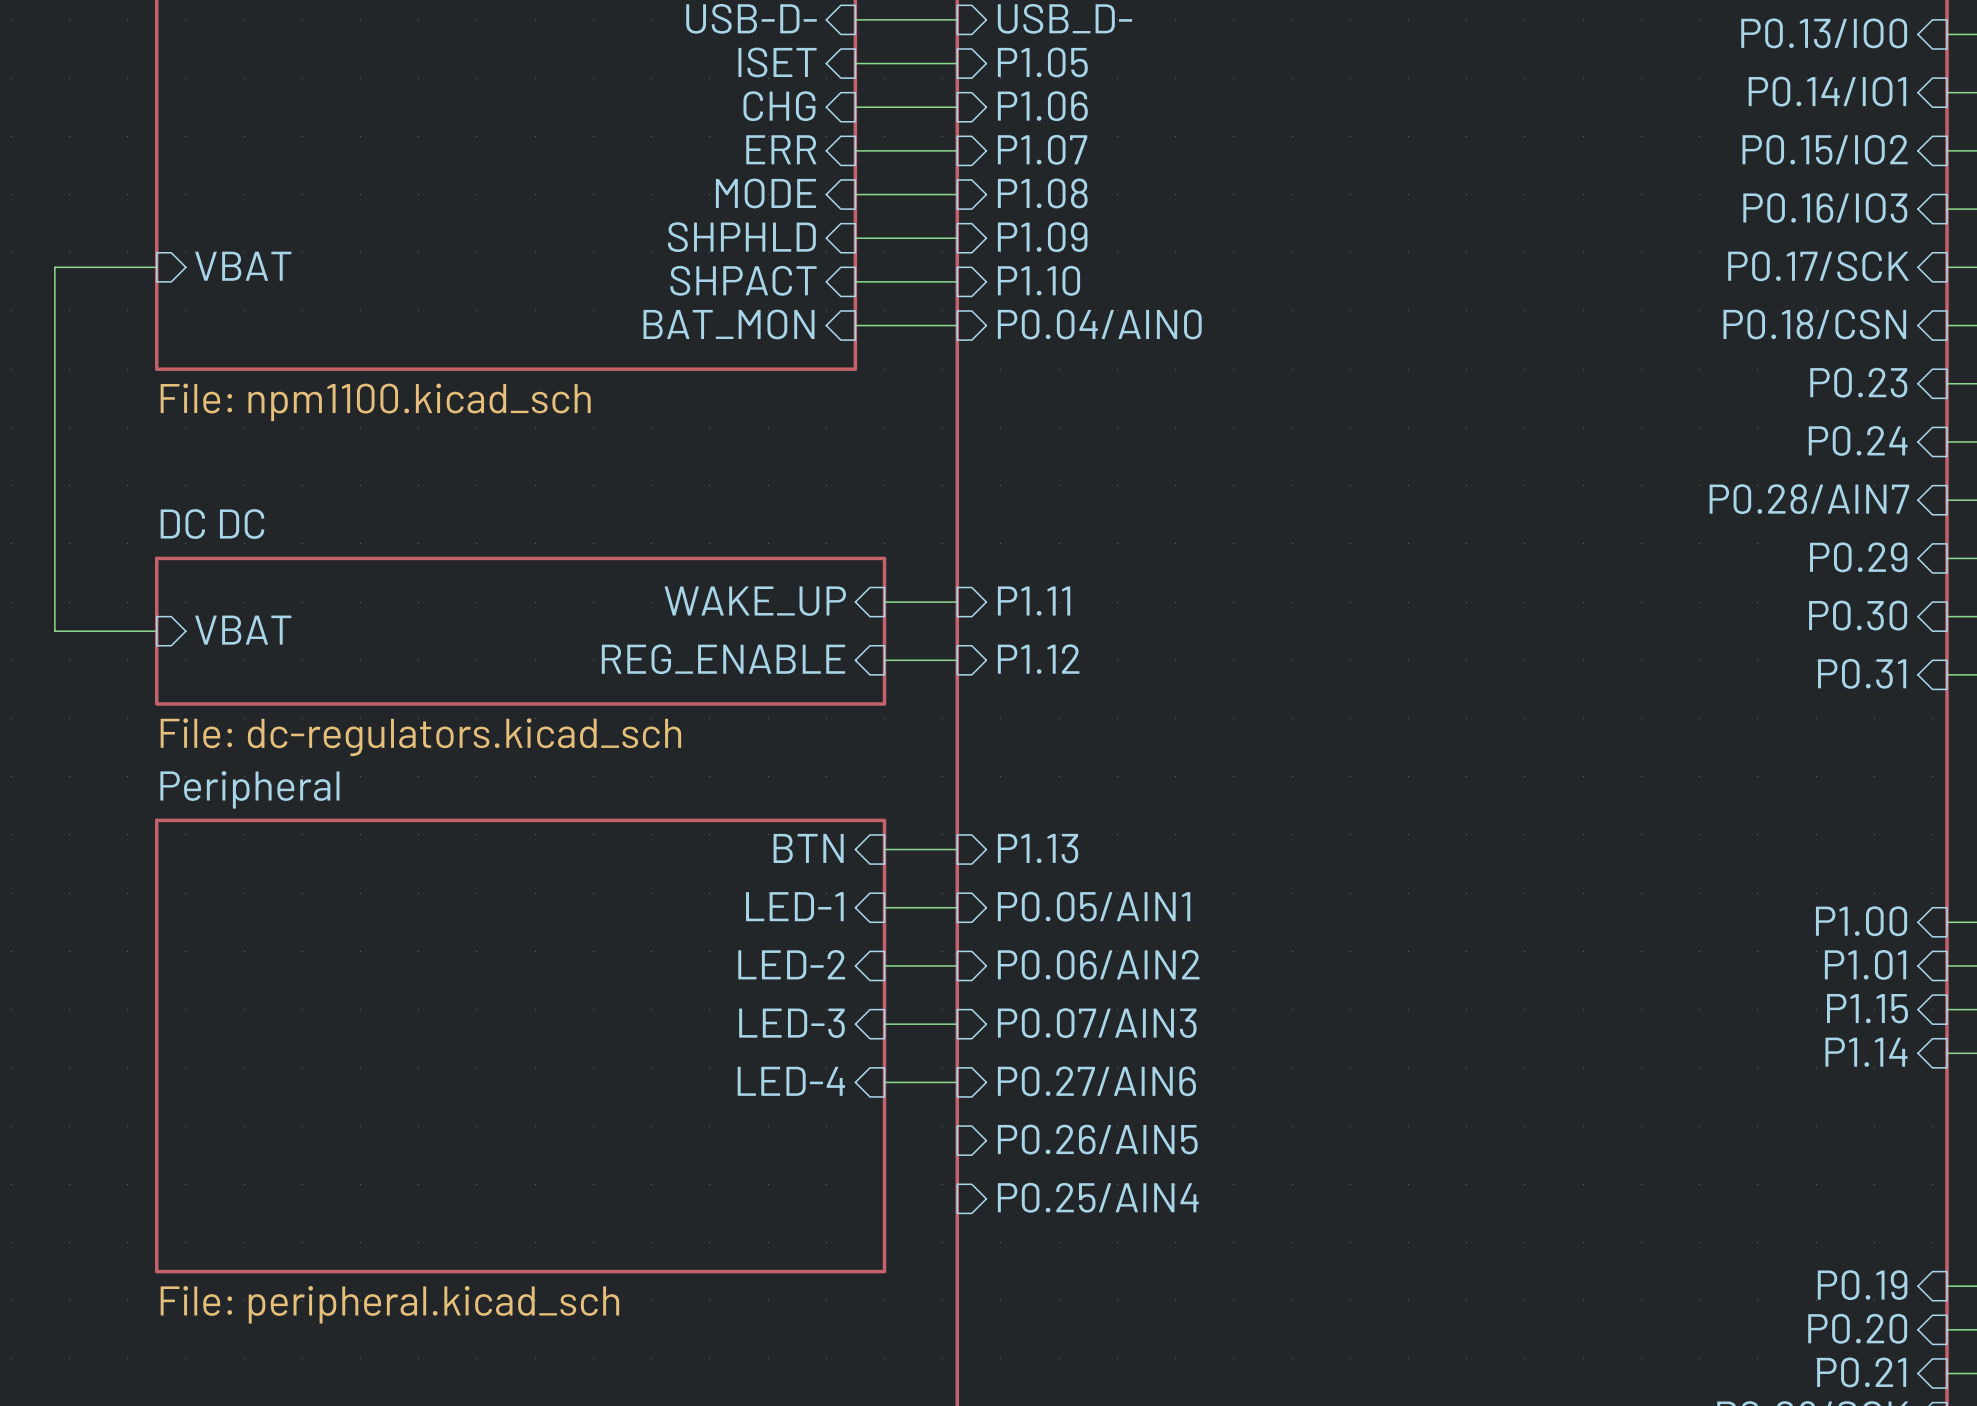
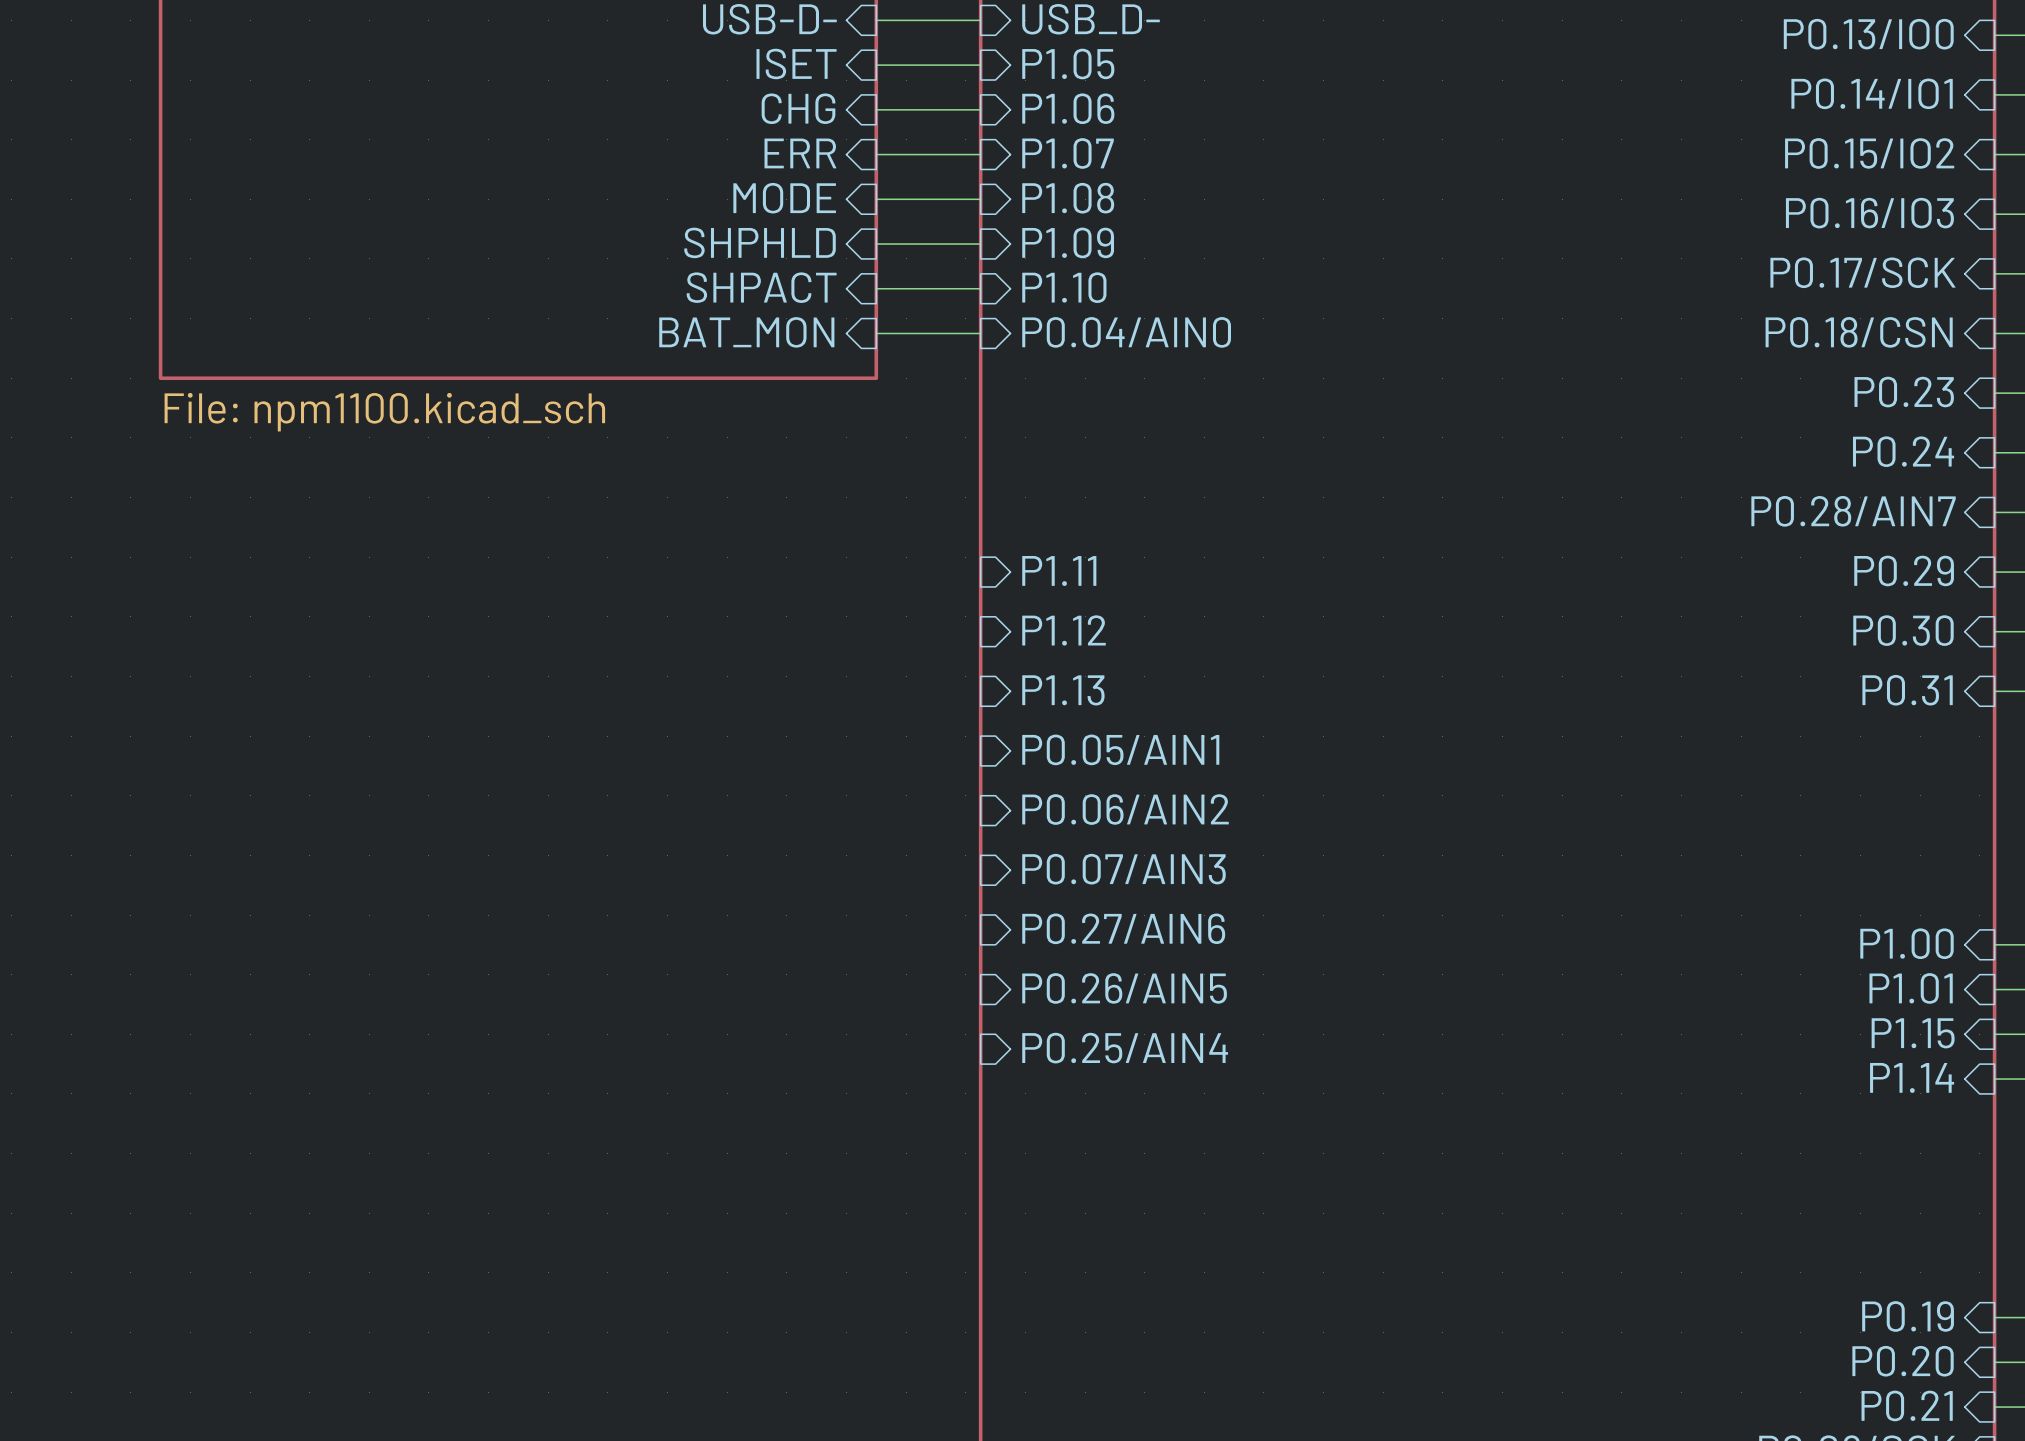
sheet pin: VBAT (243, 266) -> none
wire: (156, 267) (54, 267) (54, 631) (156, 631) -> none
sheet pin: WAKE_UP (755, 601) -> none
sheet pin position: P1.11 (1034, 601) -> P1.11 (1059, 570)
wire: (884, 602) (957, 602) -> none
sheet pin: VBAT (243, 630) -> none
sheet DC DC: File: dc-regulators.kicad_sch (520, 631) -> none
sheet pin: REG_ENABLE (723, 659) -> none
sheet pin position: P1.12 (1038, 659) -> P1.12 (1064, 630)
wire: (884, 660) (957, 660) -> none
sheet pin: none -> P1.13 (1063, 690)
sheet pin: none -> P0.05/AIN1 (1120, 749)
sheet pin: none -> P0.06/AIN2 (1125, 809)
sheet pin: BTN (808, 848) -> none
sheet pin: P1.13 (1038, 848) -> P0.07/AIN3 (1124, 869)
wire: (884, 849) (957, 849) -> none
sheet pin: LED-1 (794, 906) -> none
sheet pin: P0.05/AIN1 (1094, 906) -> P0.27/AIN6 (1123, 928)
wire: (884, 907) (957, 907) -> none
sheet pin: LED-2 (791, 964) -> none
sheet pin: P0.06/AIN2 (1098, 964) -> P0.26/AIN5 (1124, 988)
wire: (884, 965) (957, 965) -> none
sheet pin: LED-3 (792, 1023) -> none
sheet pin: P0.07/AIN3 (1097, 1023) -> P0.25/AIN4 (1125, 1048)
wire: (884, 1024) (957, 1024) -> none
sheet Peripheral: File: peripheral.kicad_sch (520, 1046) -> none
sheet pin: LED-4 (791, 1081) -> none
sheet pin: P0.27/AIN6 (1096, 1081) -> none
wire: (884, 1082) (957, 1082) -> none
sheet pin: P0.26/AIN5 (1097, 1139) -> none
sheet pin: P0.25/AIN4 (1098, 1197) -> none

